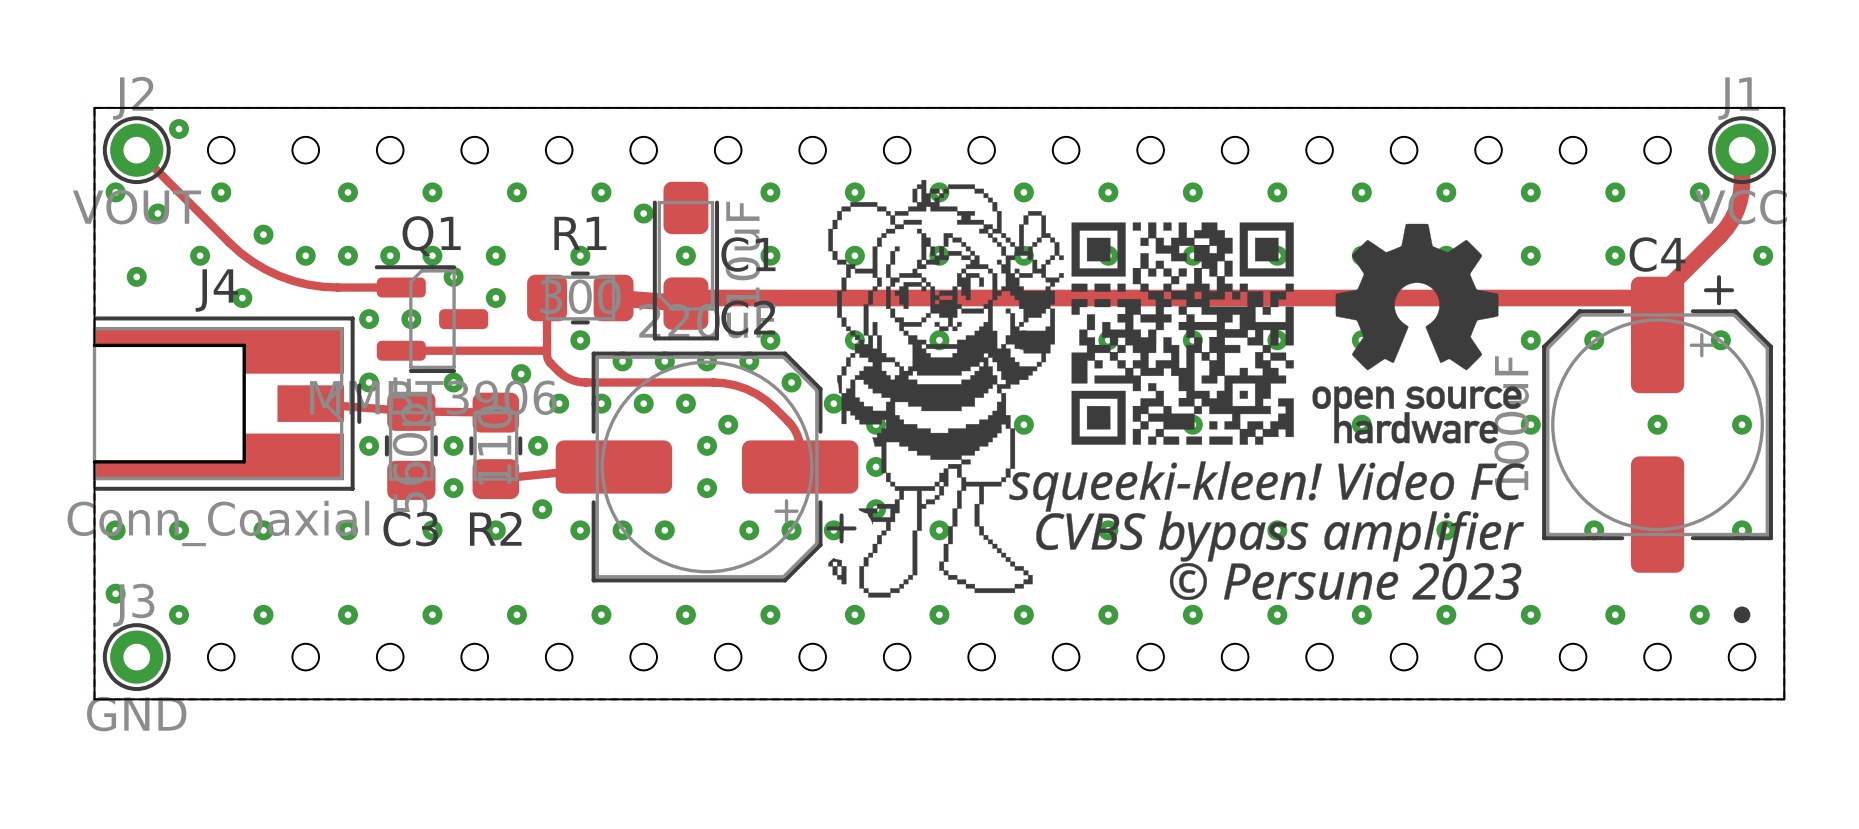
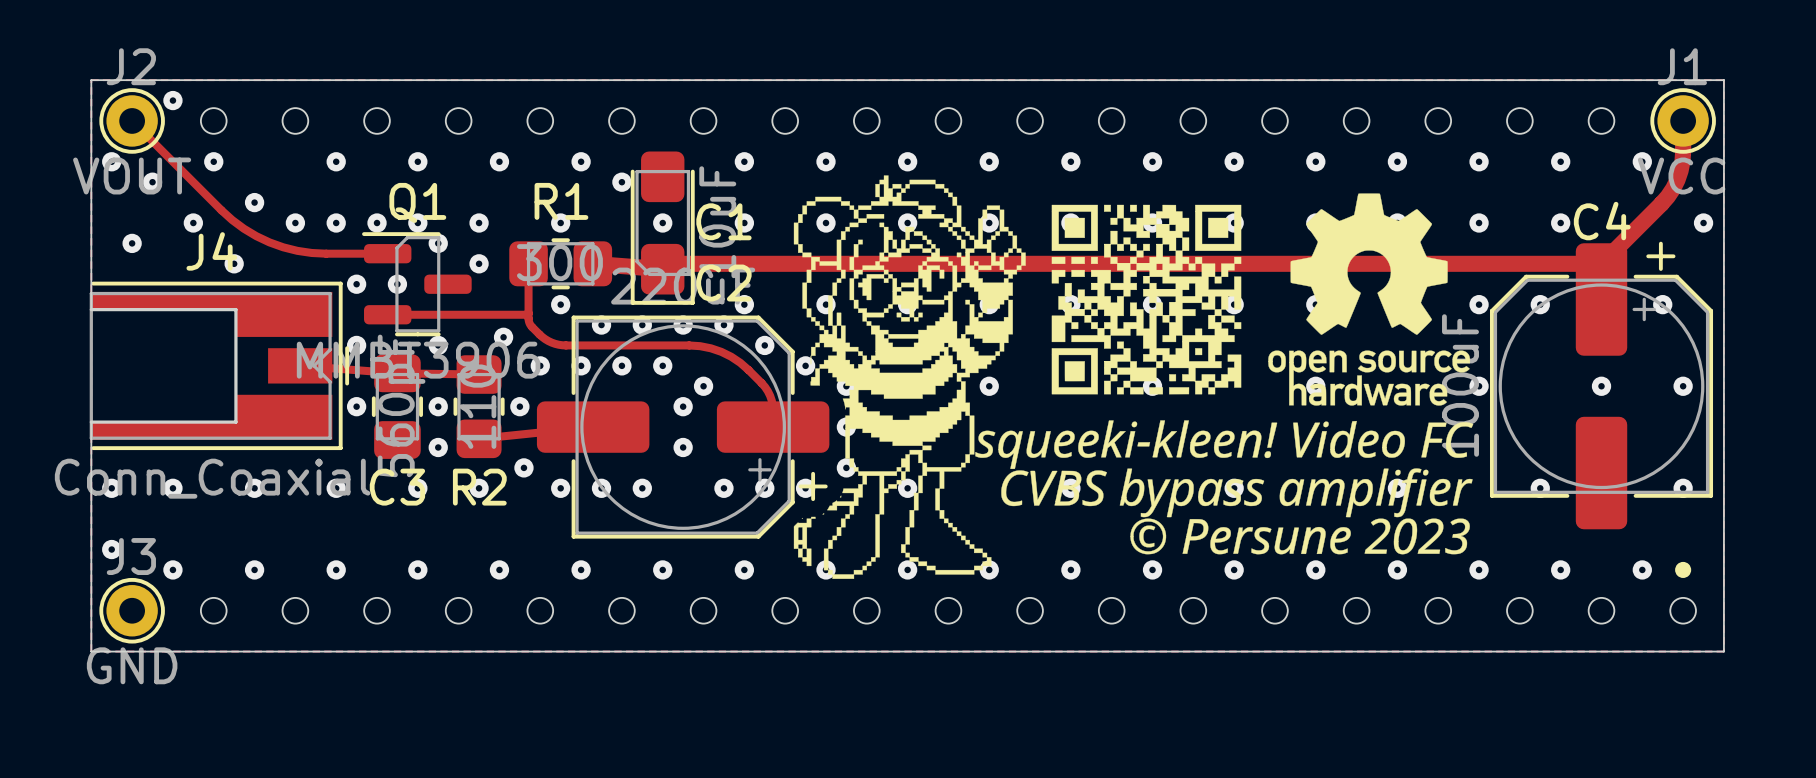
drawing shape: [828, 179, 1525, 601] -> [793, 175, 1474, 579]

